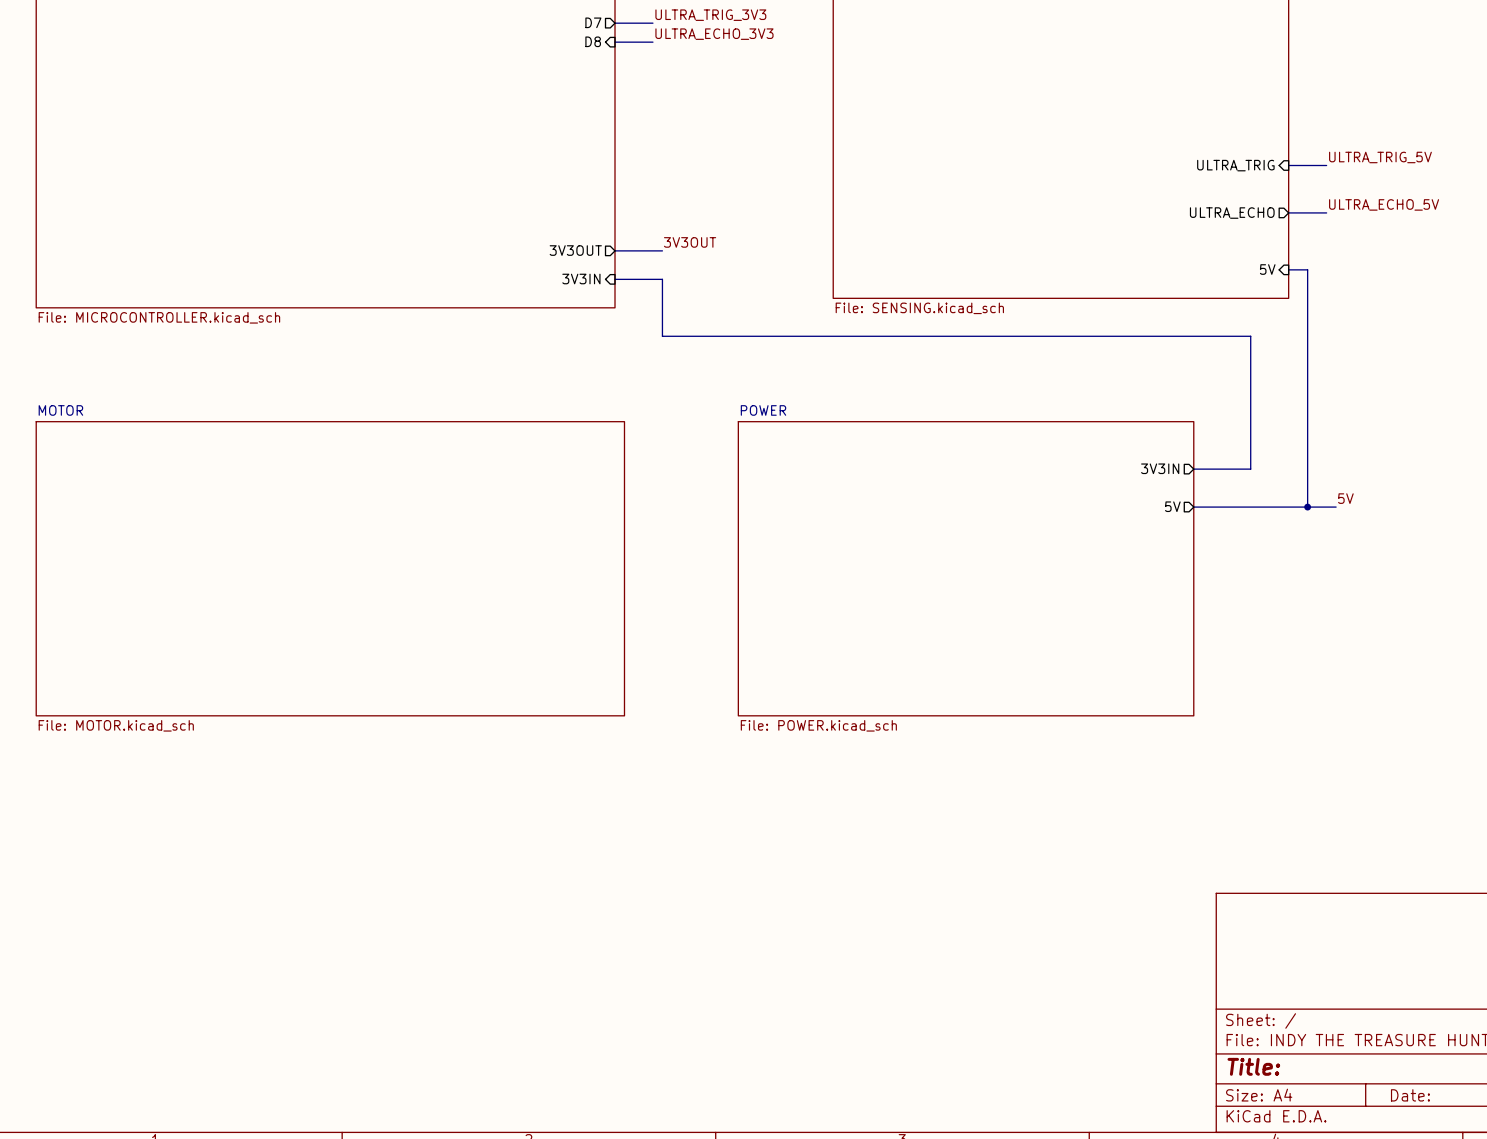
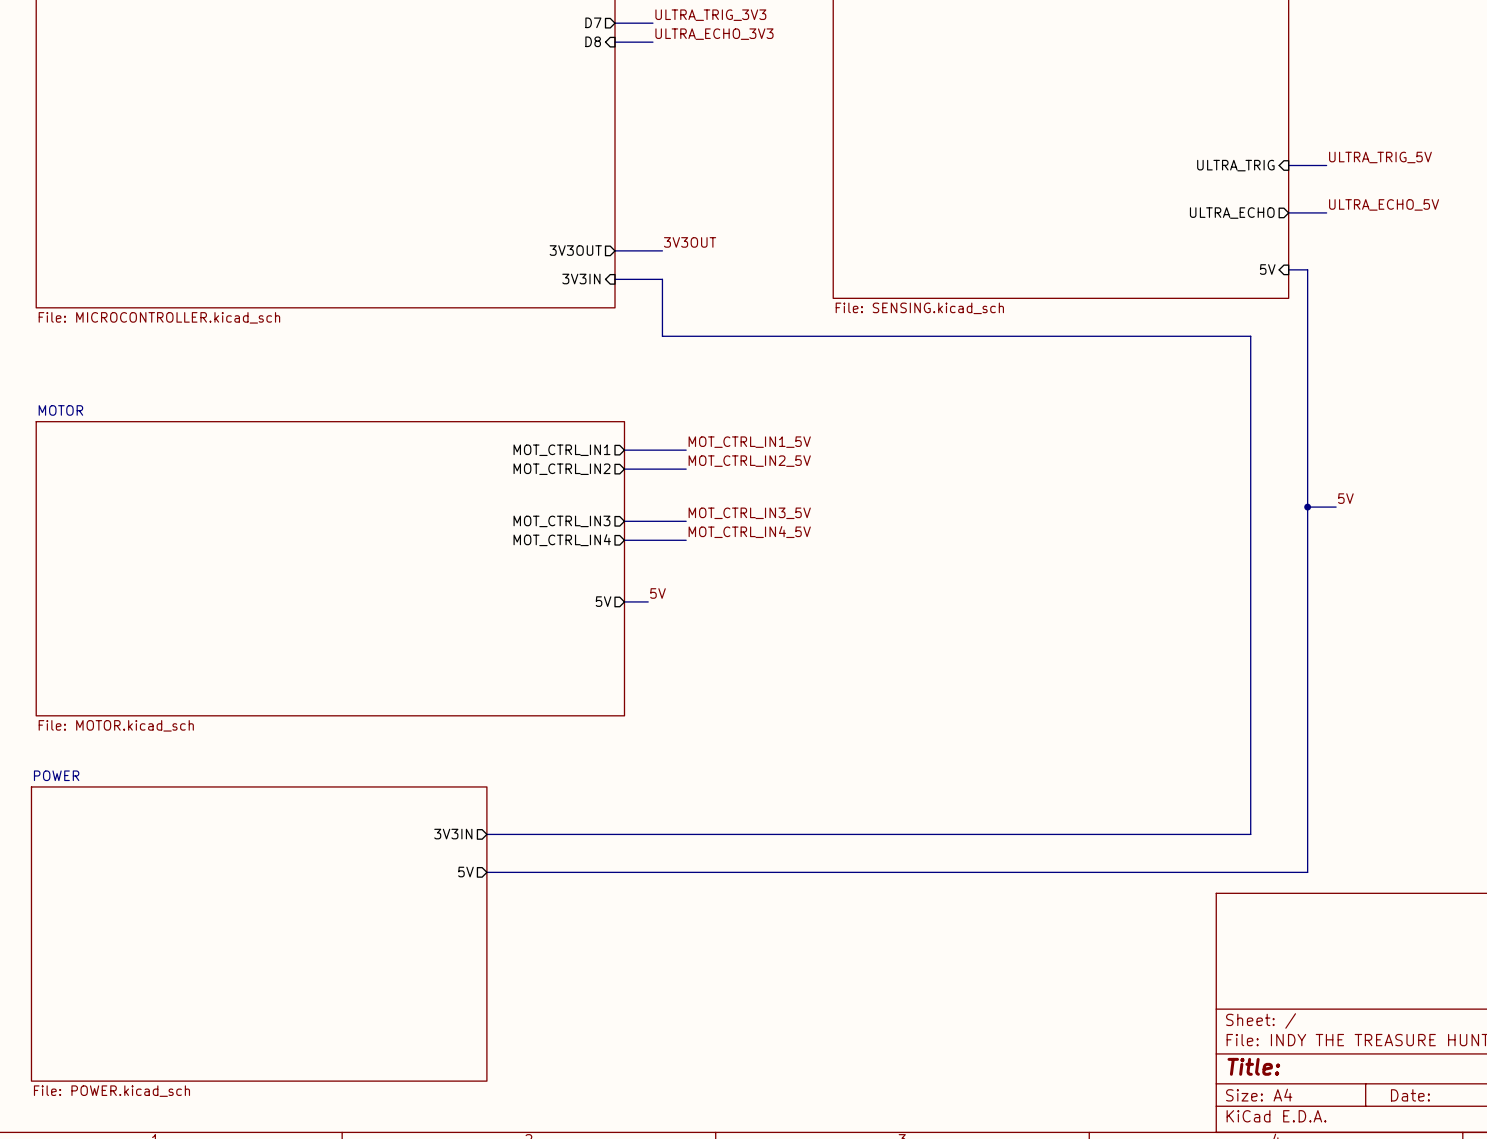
label: none -> MOT_CTRL_IN1_5V (749, 442)
sheet pin: none -> MOT_CTRL_IN1 (561, 450)
wire: none -> (624, 450) (686, 450)
label: none -> MOT_CTRL_IN2_5V (749, 461)
sheet pin: 3V3IN (1160, 468) -> none
sheet pin: none -> MOT_CTRL_IN2 (561, 469)
wire: none -> (624, 469) (686, 469)
wire: (1193, 469) (1250, 469) -> (486, 834) (1250, 834) (1250, 469)
sheet pin: 5V (1172, 506) -> none
wire: (1193, 507) (1307, 507) -> (486, 872) (1307, 872) (1307, 507)
label: none -> MOT_CTRL_IN3_5V (749, 513)
sheet pin: none -> MOT_CTRL_IN3 (561, 521)
wire: none -> (624, 521) (686, 521)
label: none -> MOT_CTRL_IN4_5V (749, 532)
sheet pin: none -> MOT_CTRL_IN4 (562, 540)
wire: none -> (624, 540) (686, 540)
sheet POWER: File: POWER.kicad_sch (966, 568) -> none
label: none -> 5V (657, 593)
sheet pin: none -> 5V (603, 601)
wire: none -> (624, 601) (648, 601)
sheet pin: none -> 3V3IN (453, 834)
sheet pin: none -> 5V (465, 872)
sheet POWER: none -> File: POWER.kicad_sch (259, 934)

